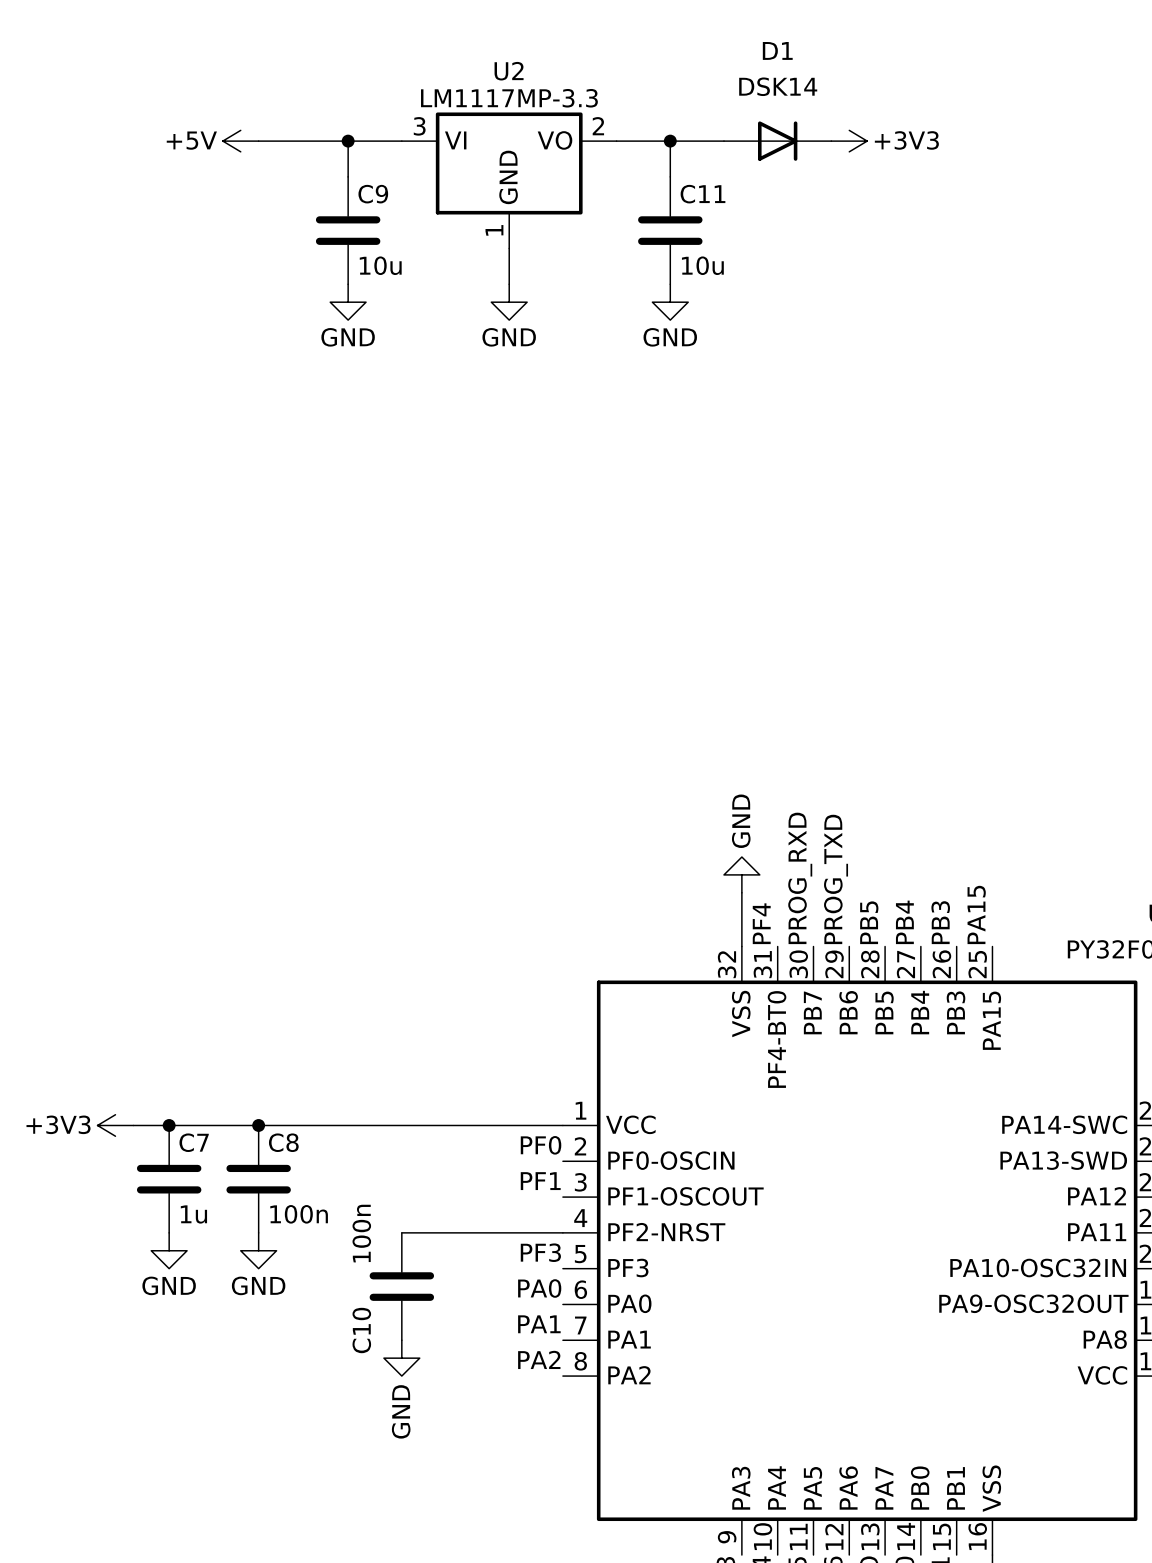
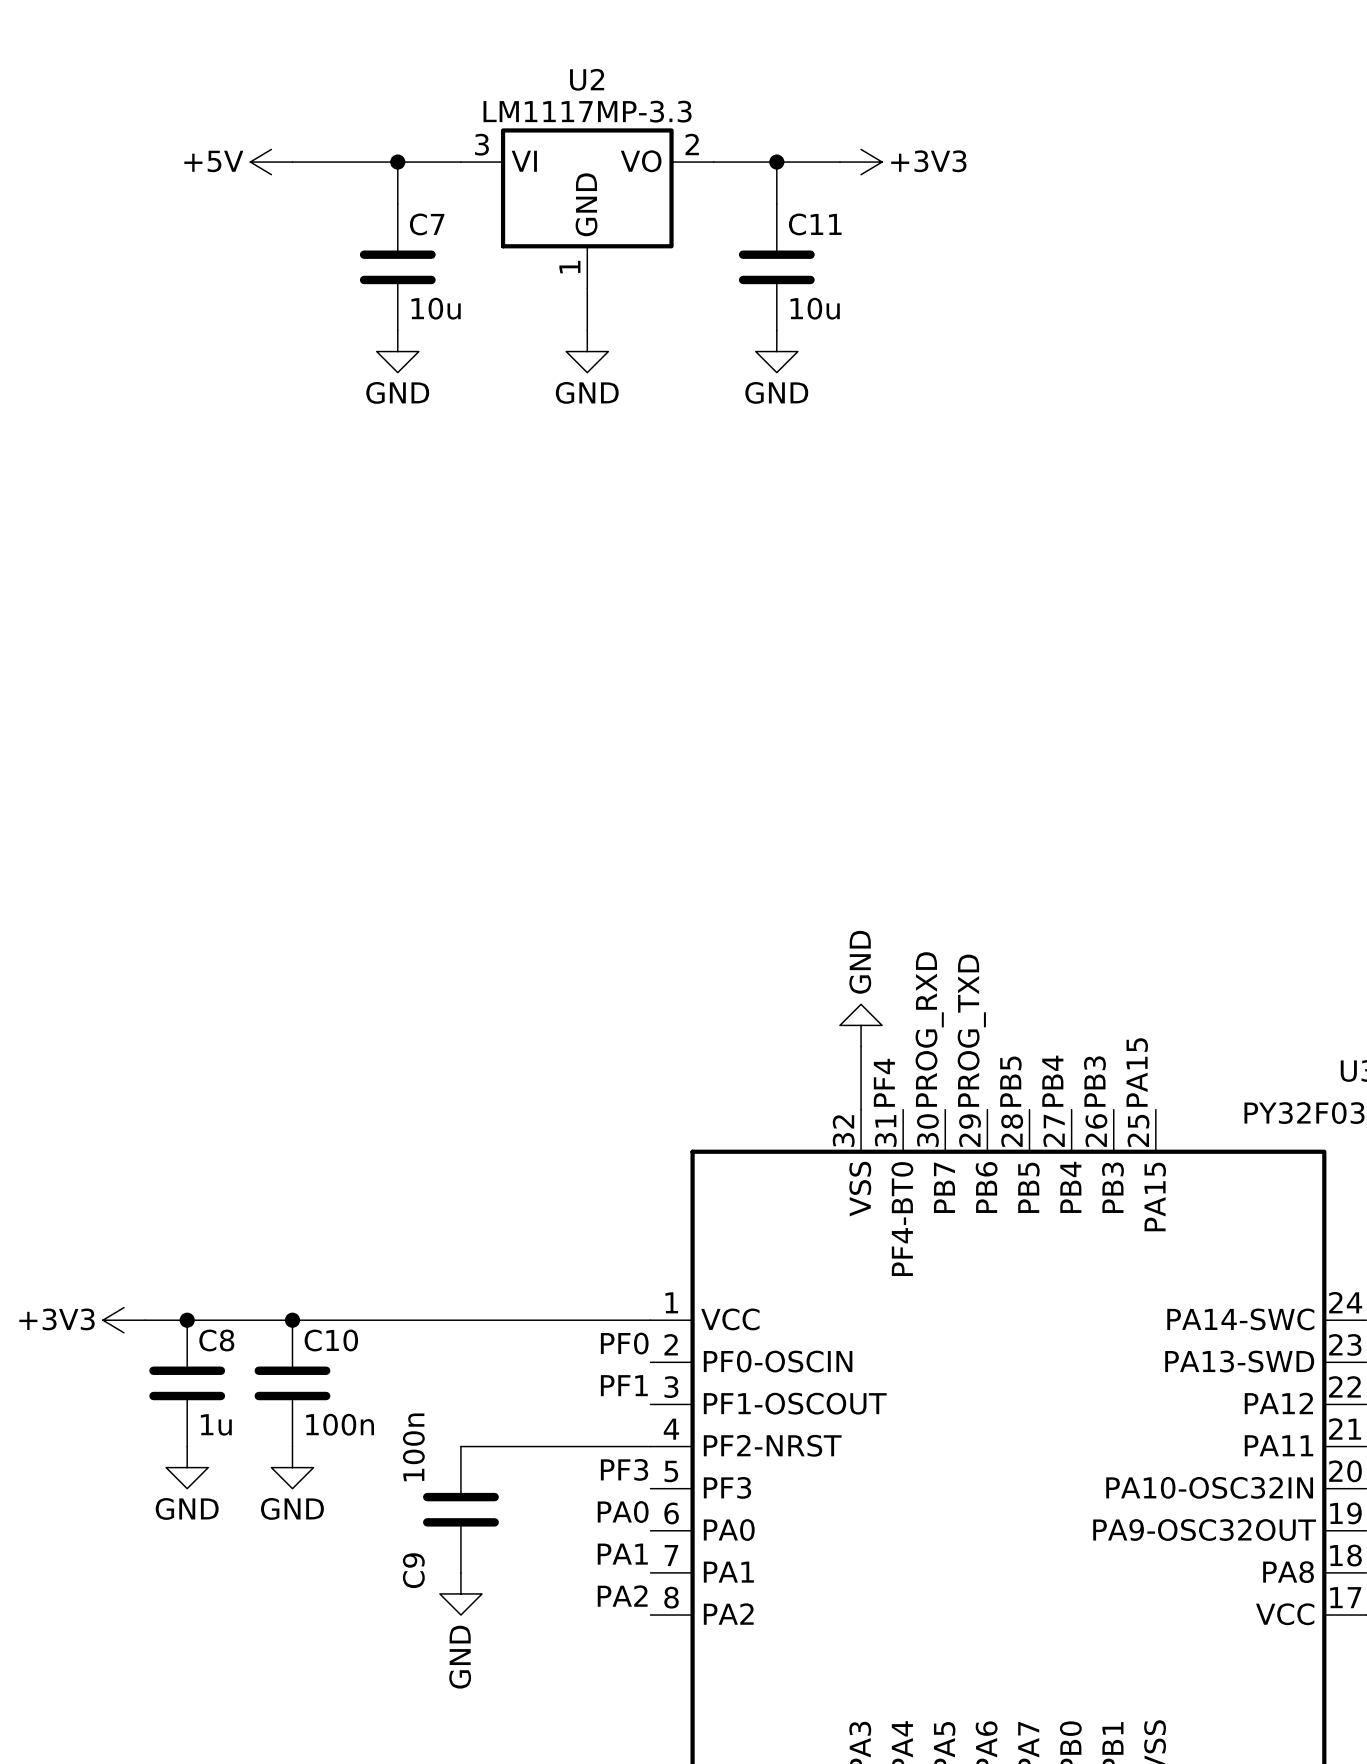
D1: DSK14 (777, 141) -> none
power symbol position: +3V3 (849, 141) -> +3V3 (861, 162)
C9 name: C9 (373, 194) -> C7 (427, 224)
C7 name: C7 (194, 1142) -> C8 (216, 1340)
C8 name: C8 (283, 1142) -> C10 (331, 1340)
C10 name: C10 (361, 1330) -> C9 (413, 1570)

